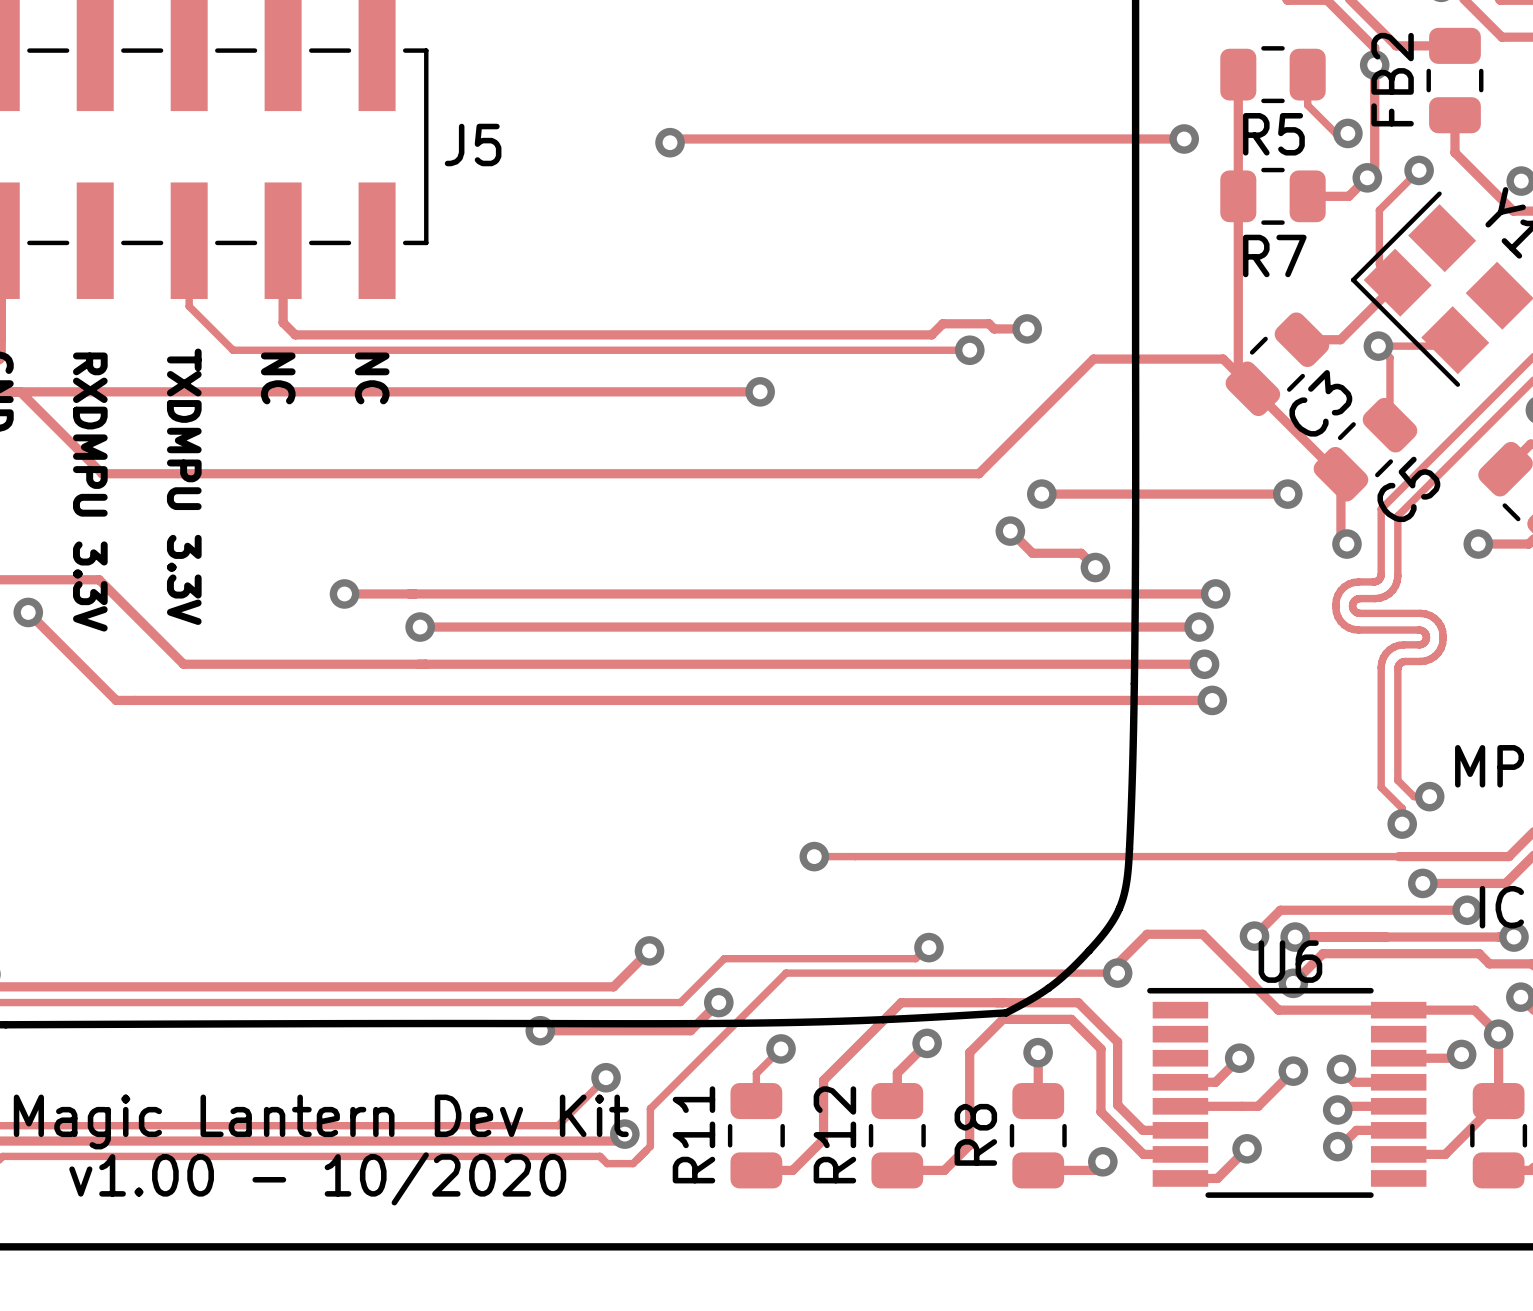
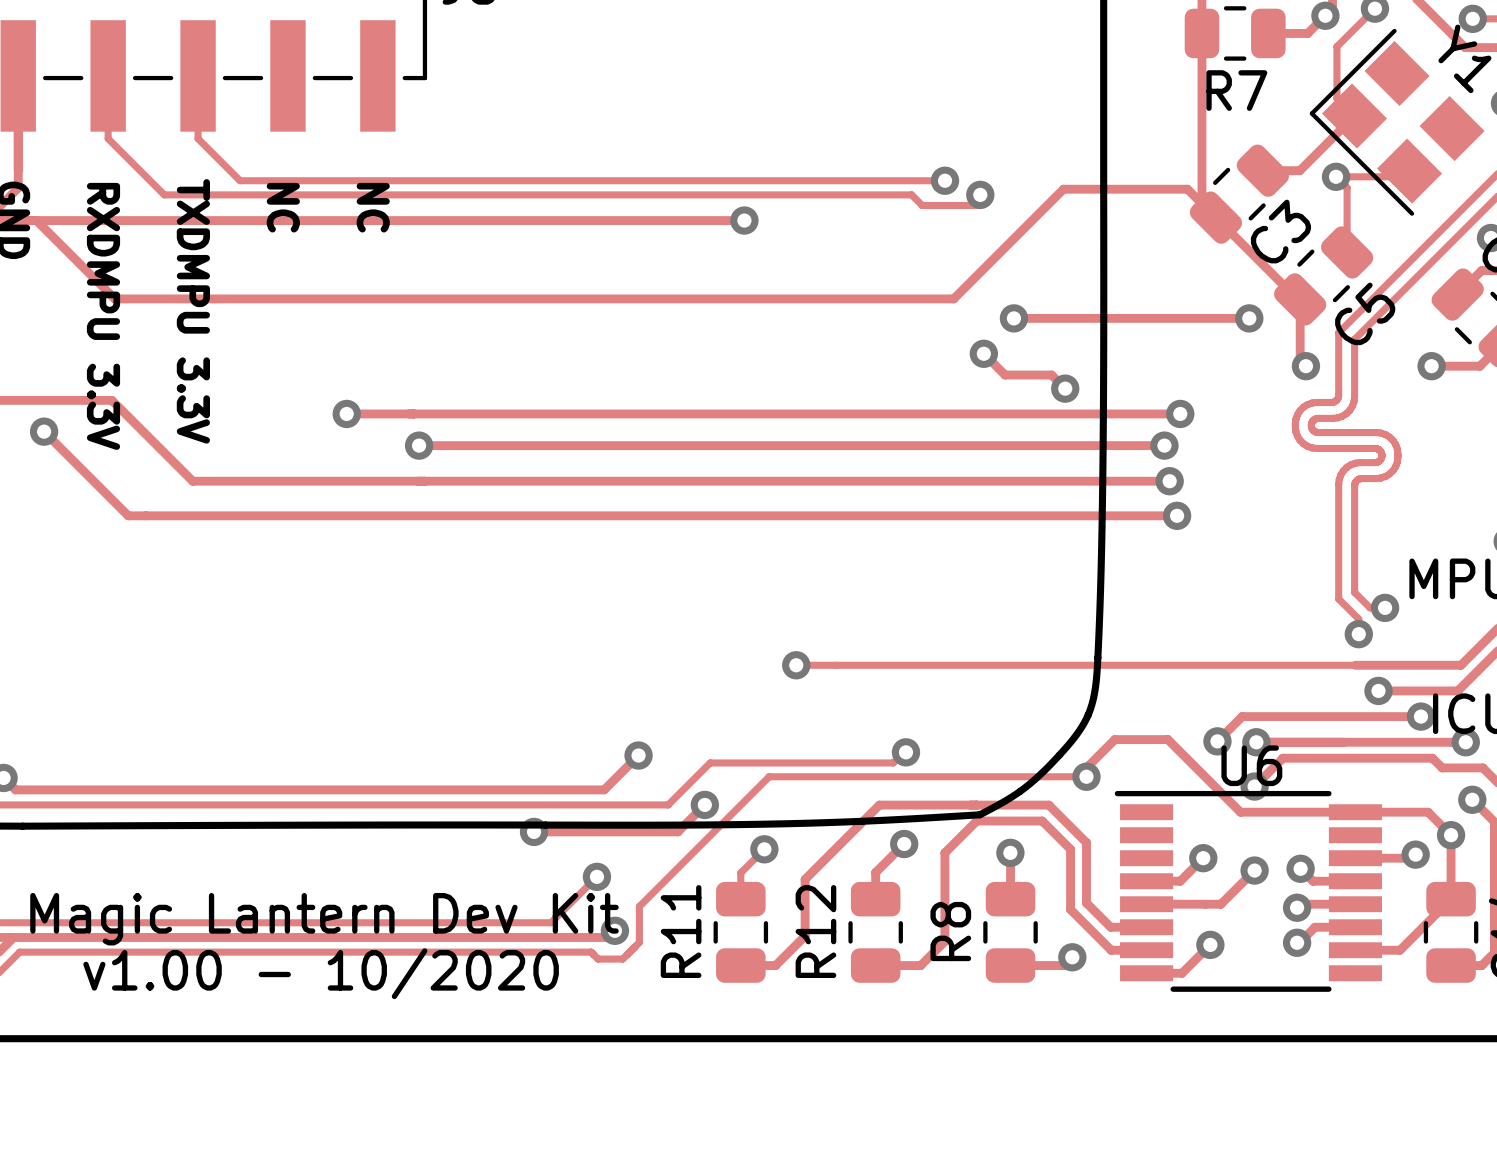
track: none -> (108, 75) (108, 138) (164, 194) (911, 194) (922, 205) (979, 205)
track: (283, 240) (283, 322) (295, 334) (931, 334) (942, 323) (988, 323) (994, 328) (1027, 328) (1022, 323) -> none
via position: (1027, 328) -> (980, 194)

